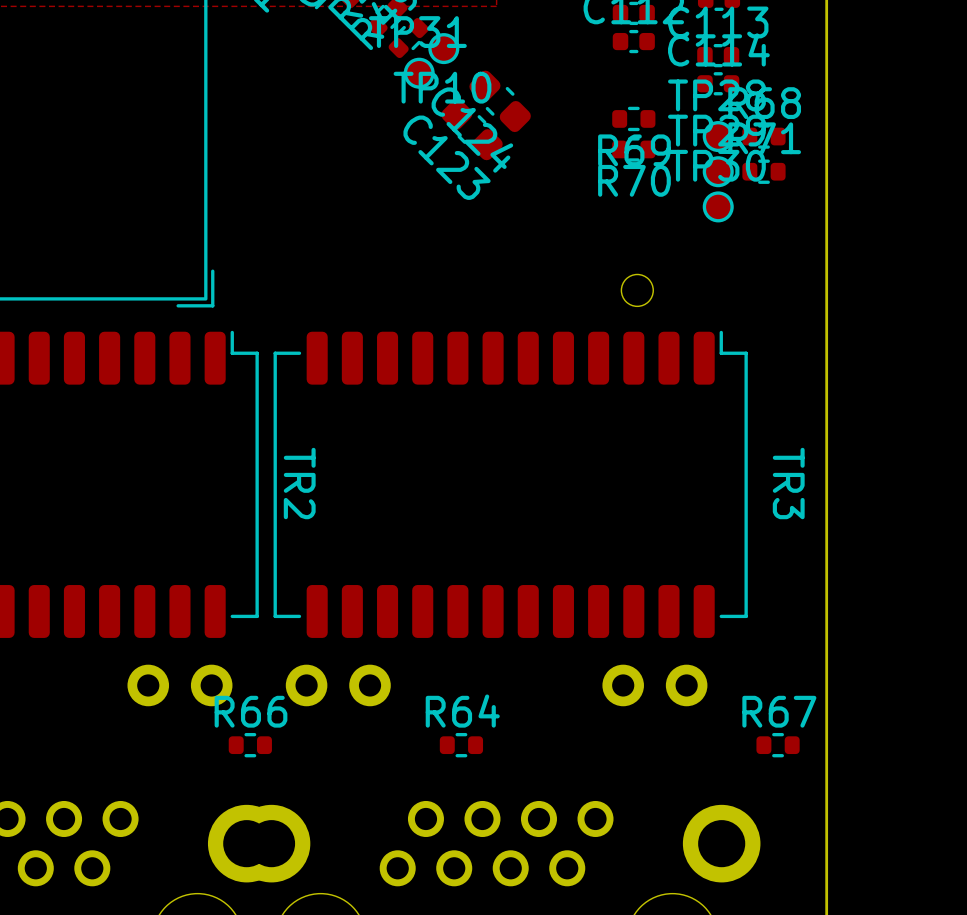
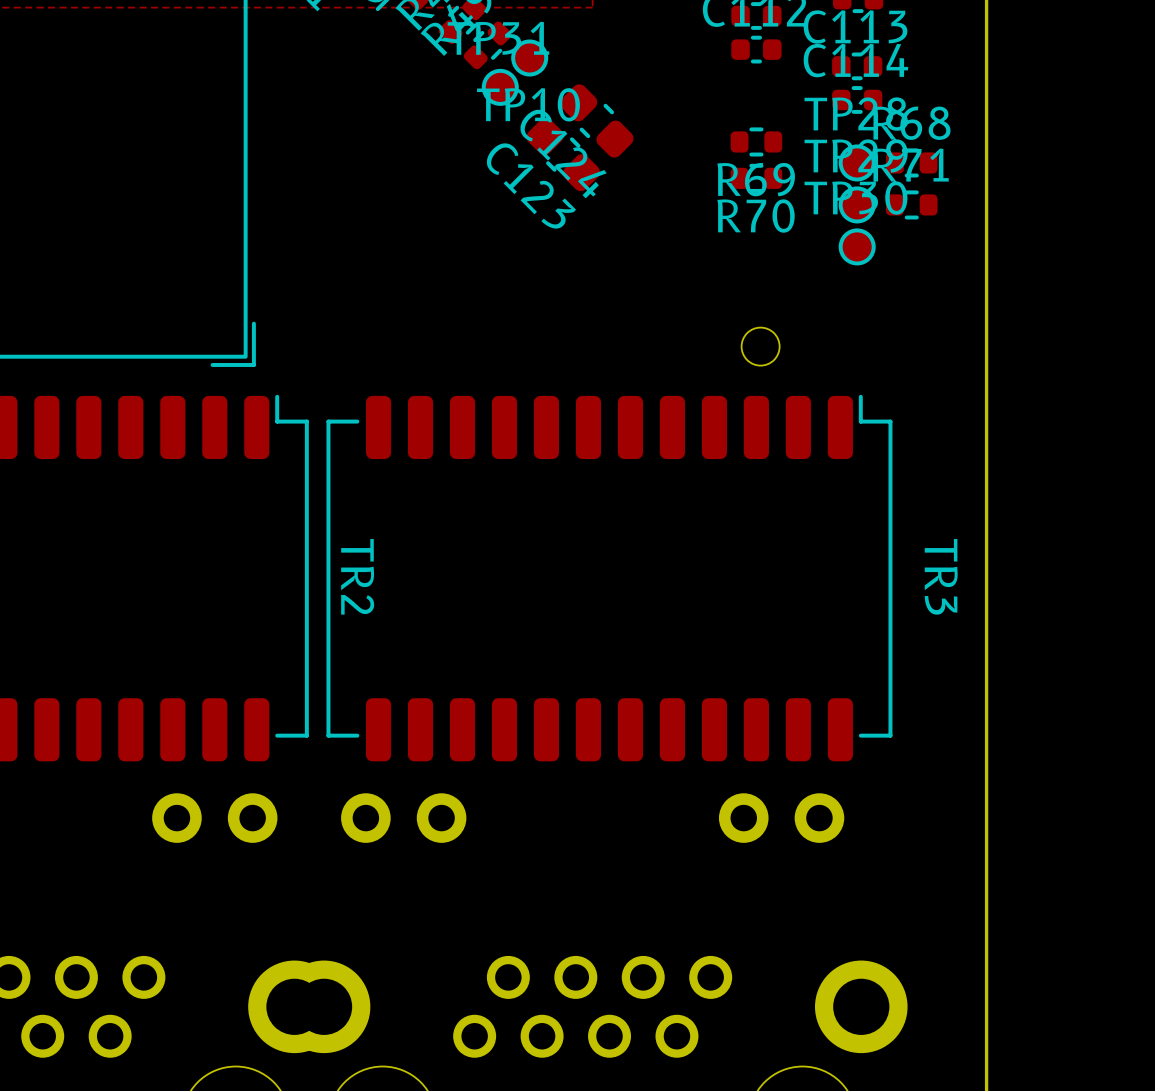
R66: (250, 745) -> none
R64: (461, 745) -> none
R67: (778, 745) -> none

